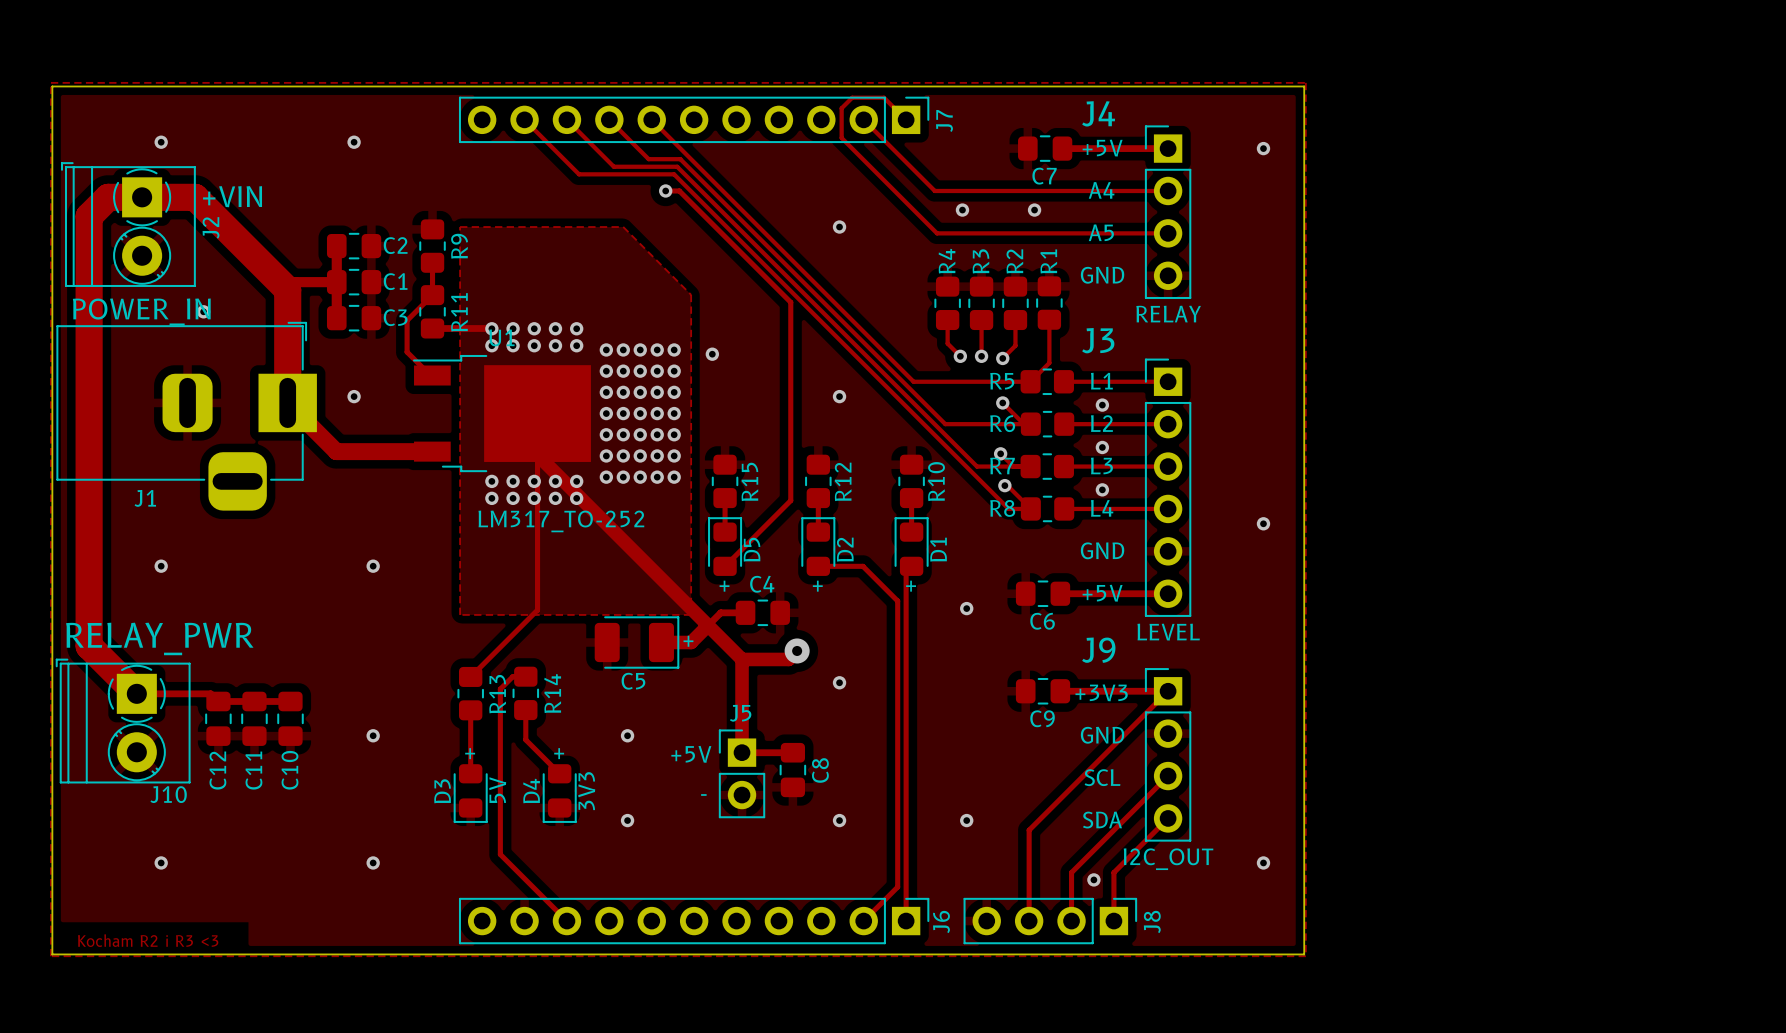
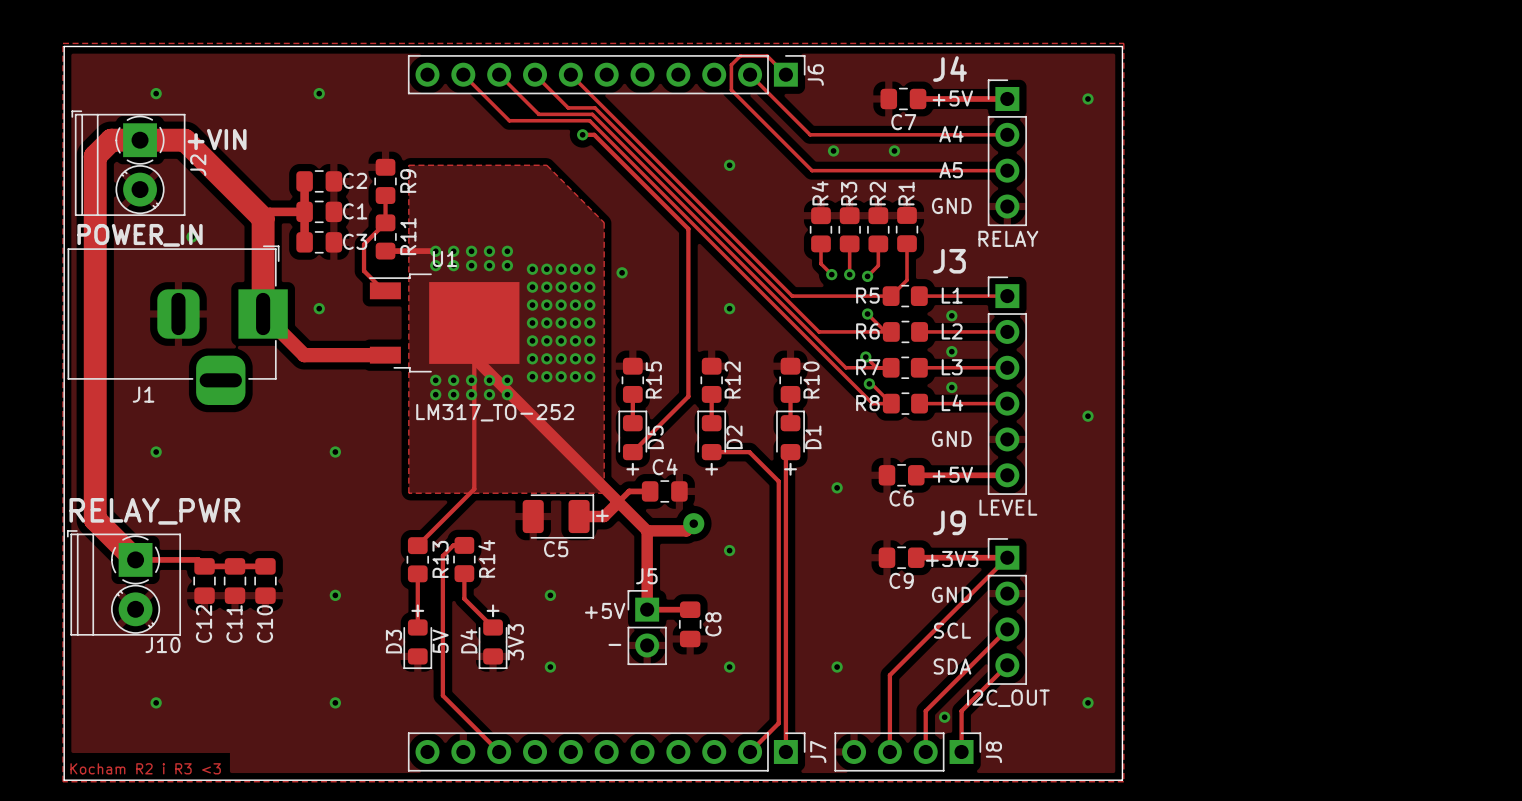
J7 name: J7 (944, 120) -> J6 (815, 75)
J6 name: J6 (941, 921) -> J7 (818, 751)

